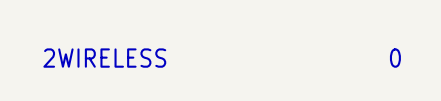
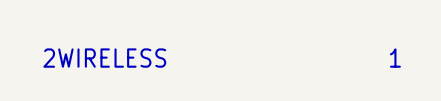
text: 0 (395, 58) -> 1 (395, 58)

